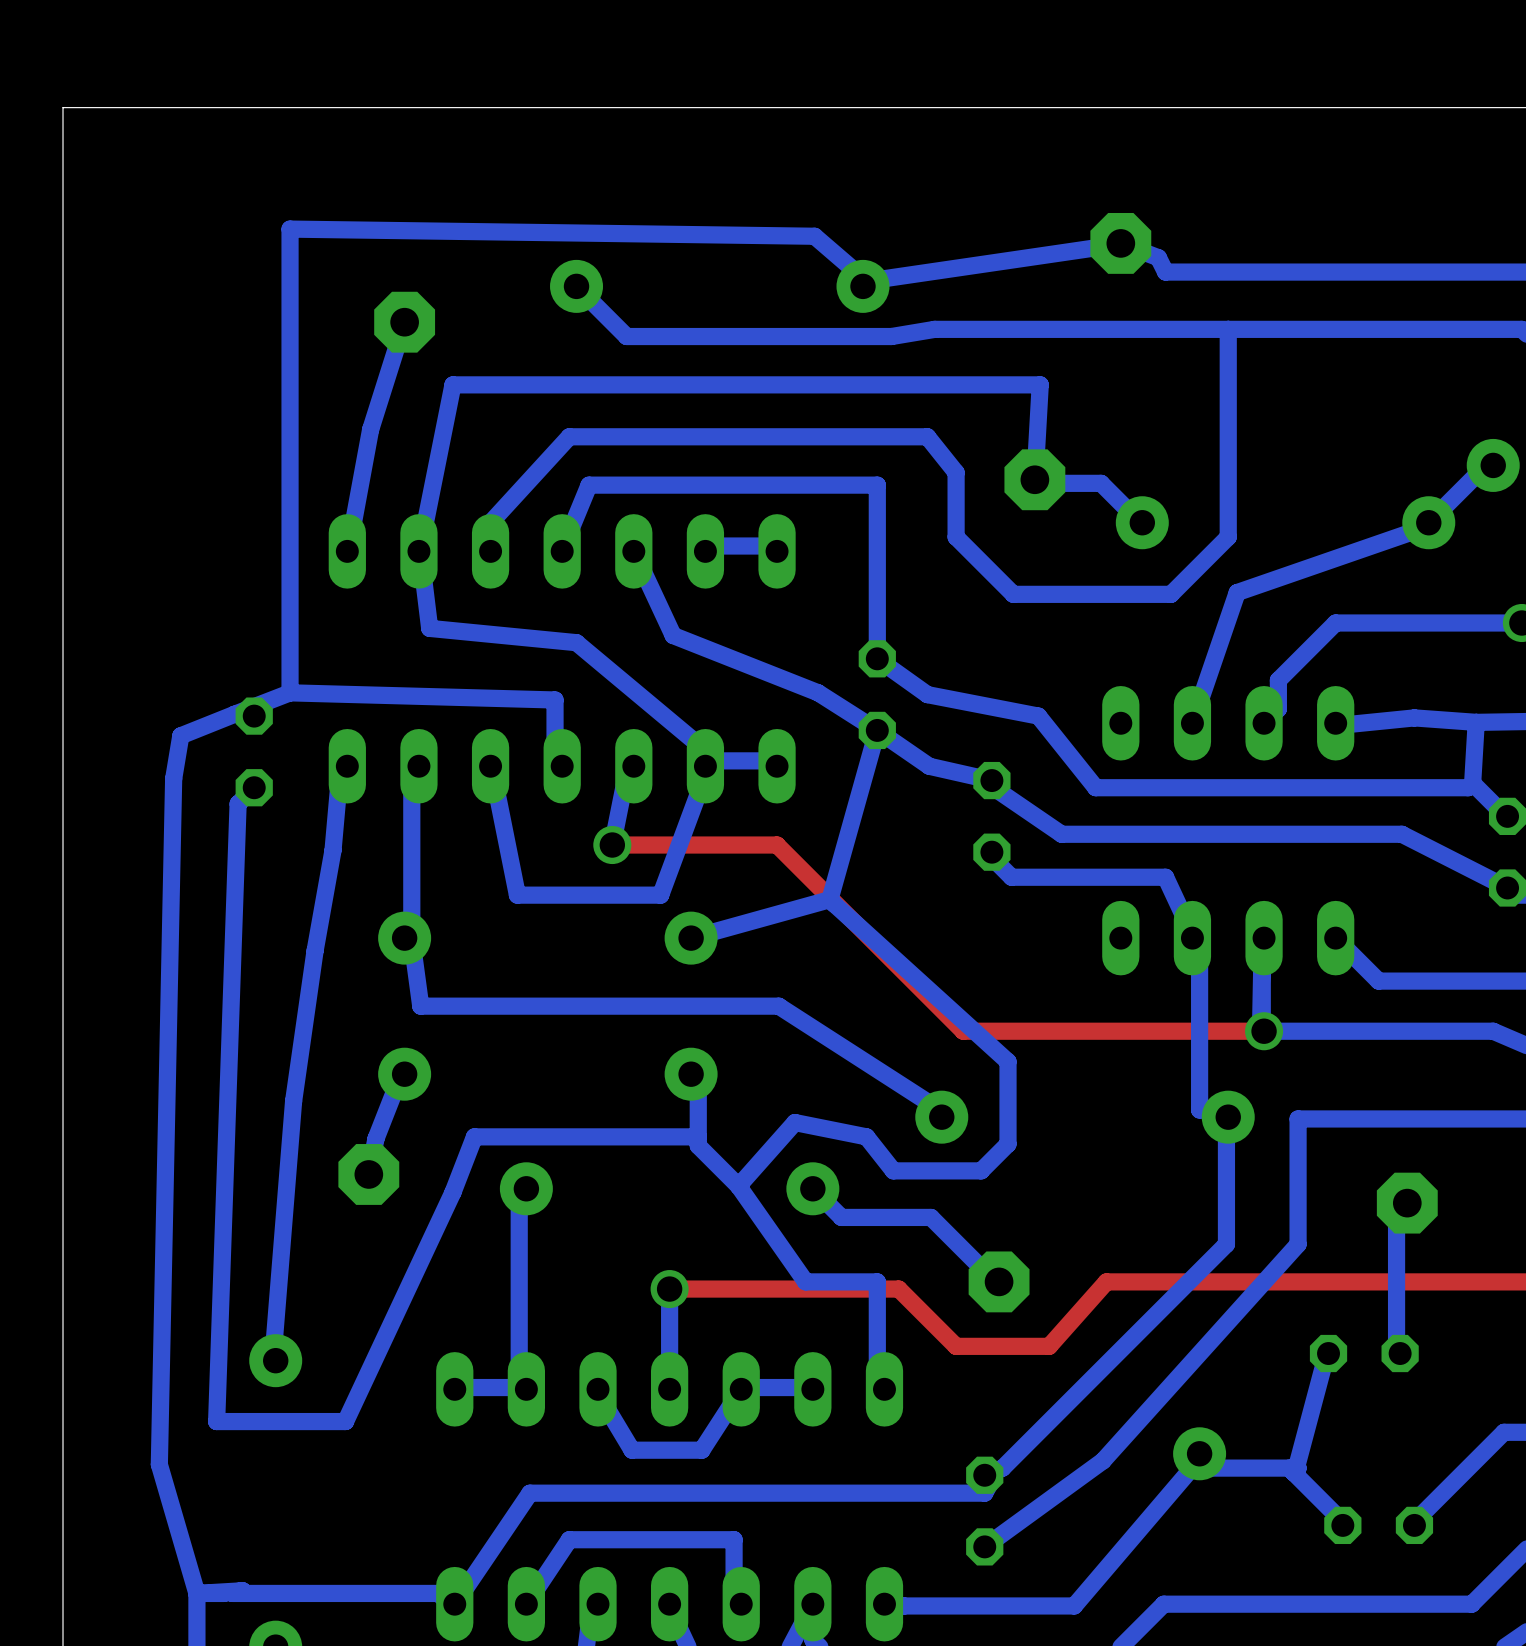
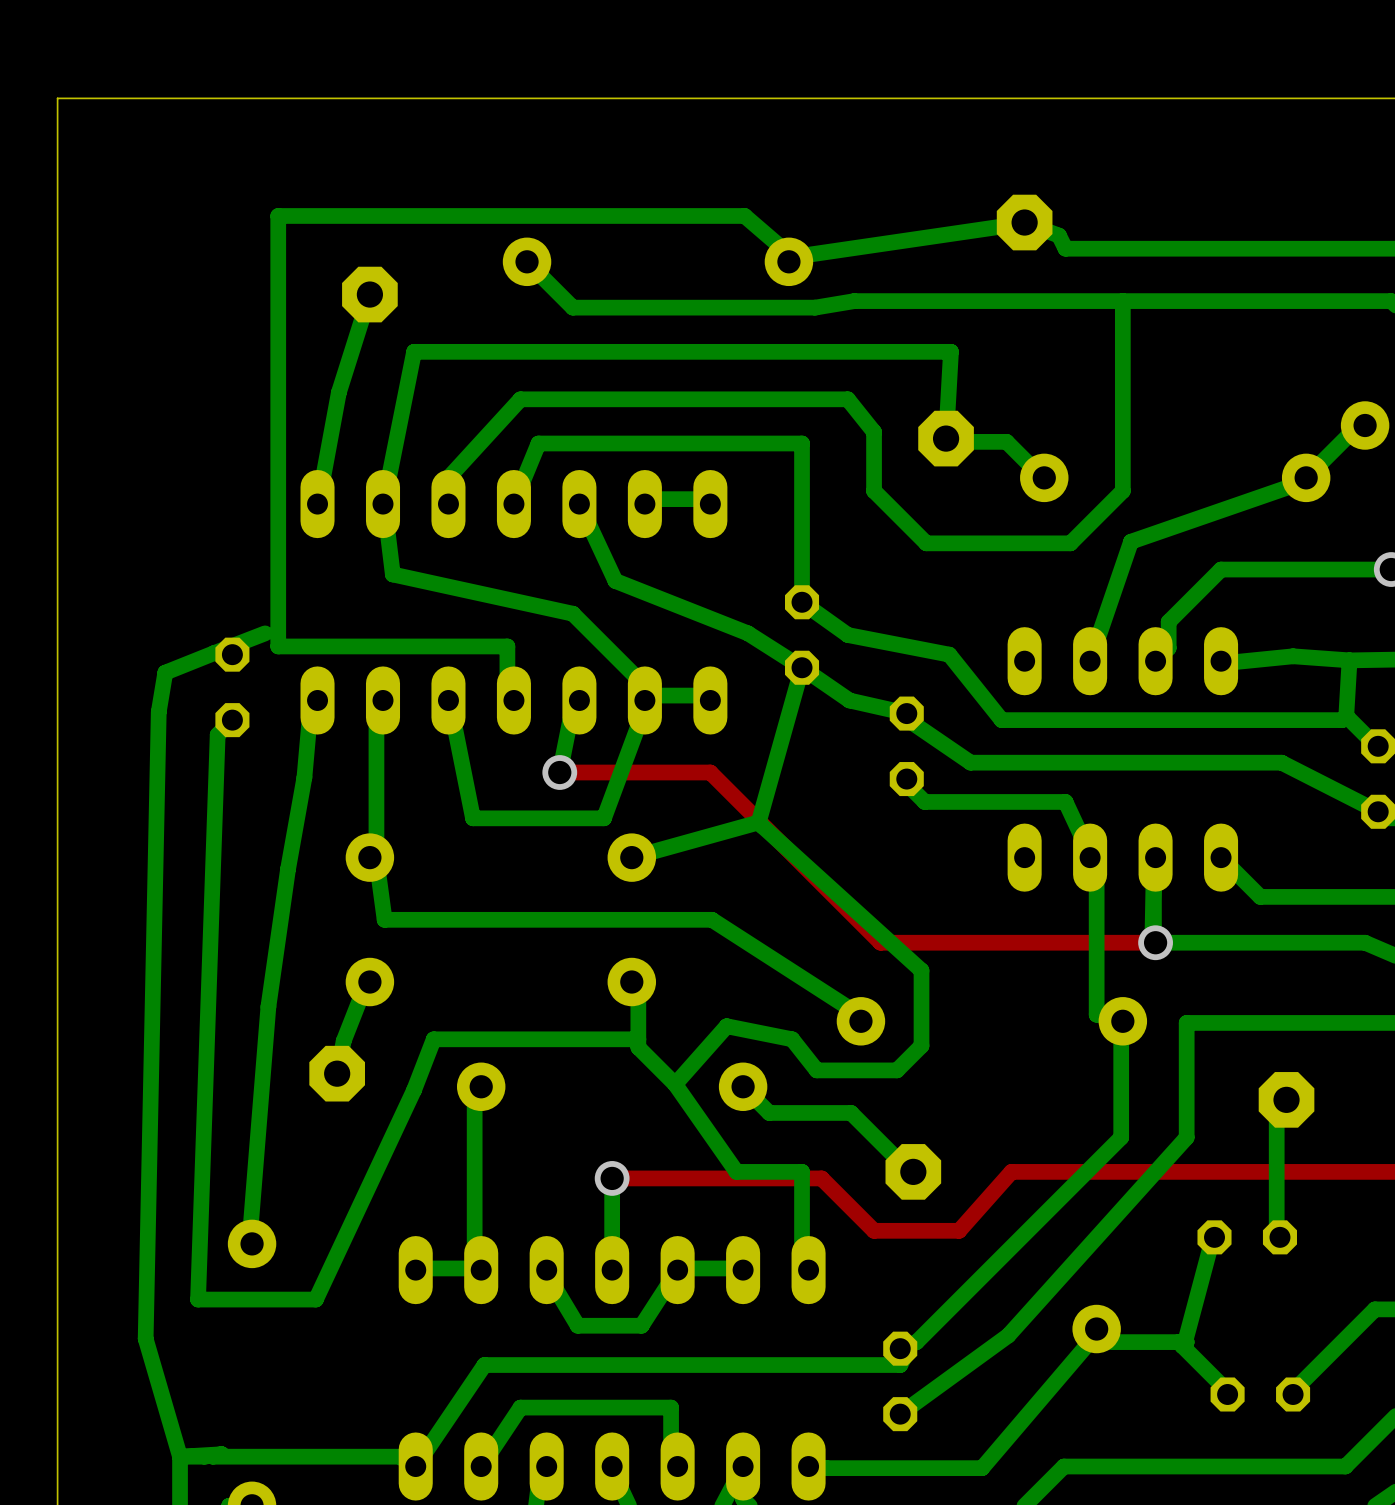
bottom track: (814, 236) (290, 229) (290, 692) (555, 699) (555, 707) -> (744, 215) (278, 215) (278, 646) (507, 646)
bottom track: (429, 628) (576, 642) (707, 751) -> (392, 574) (572, 613) (646, 687)

